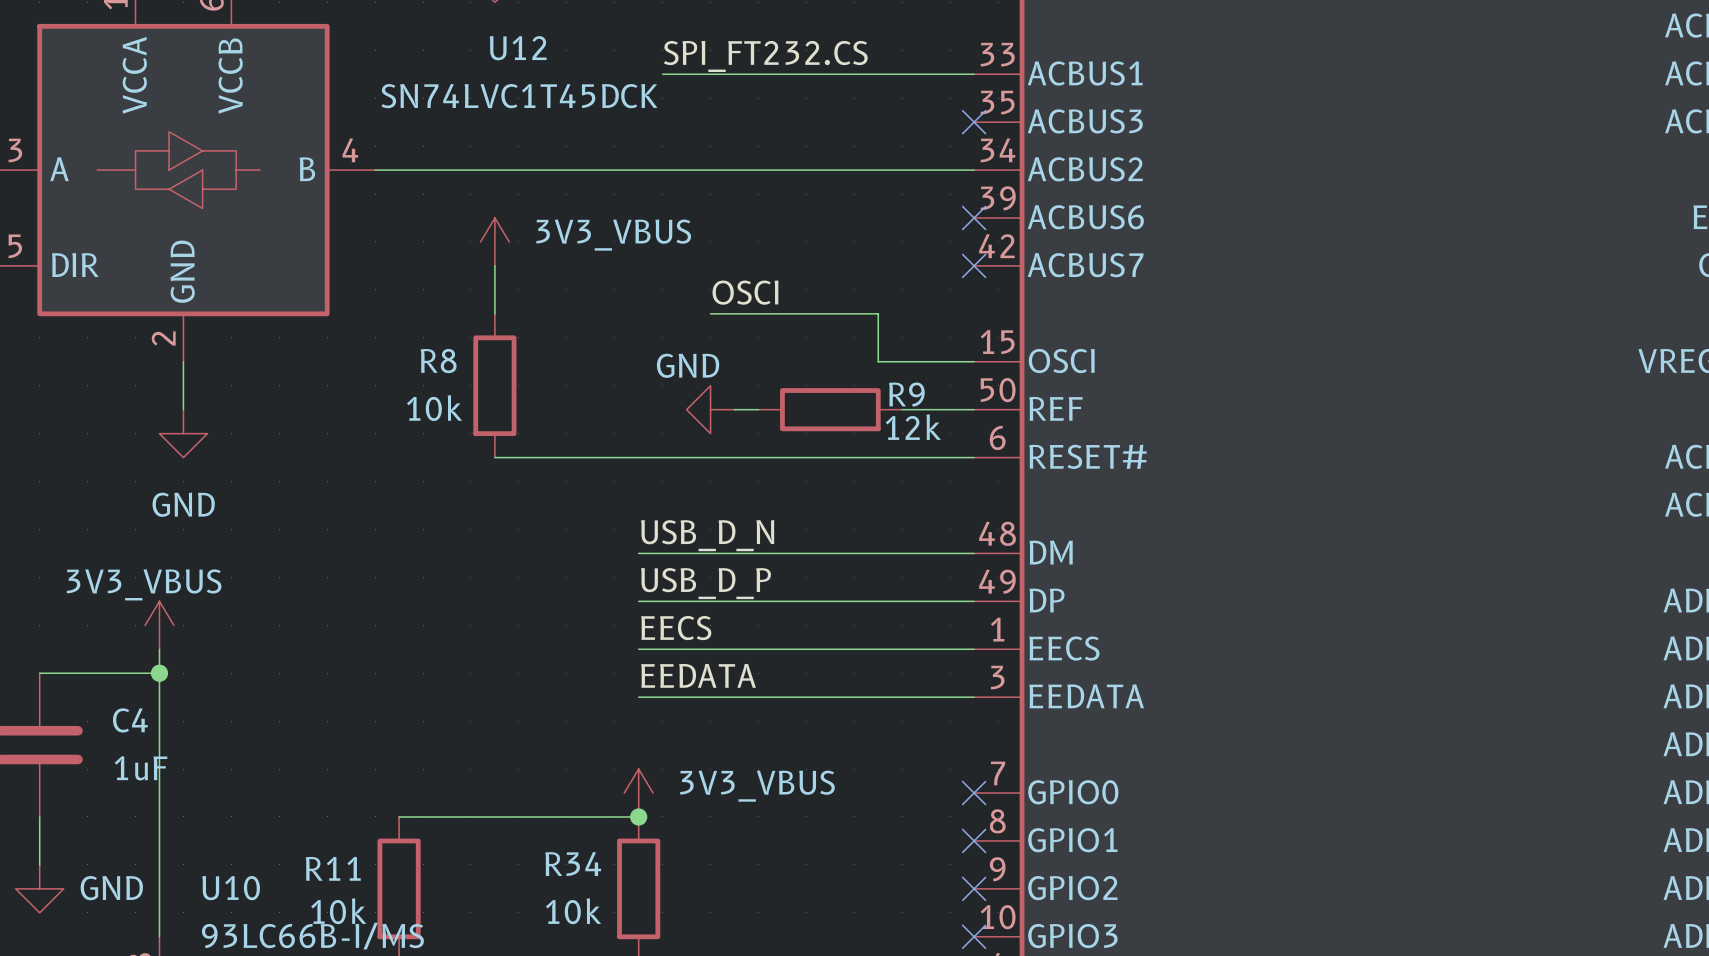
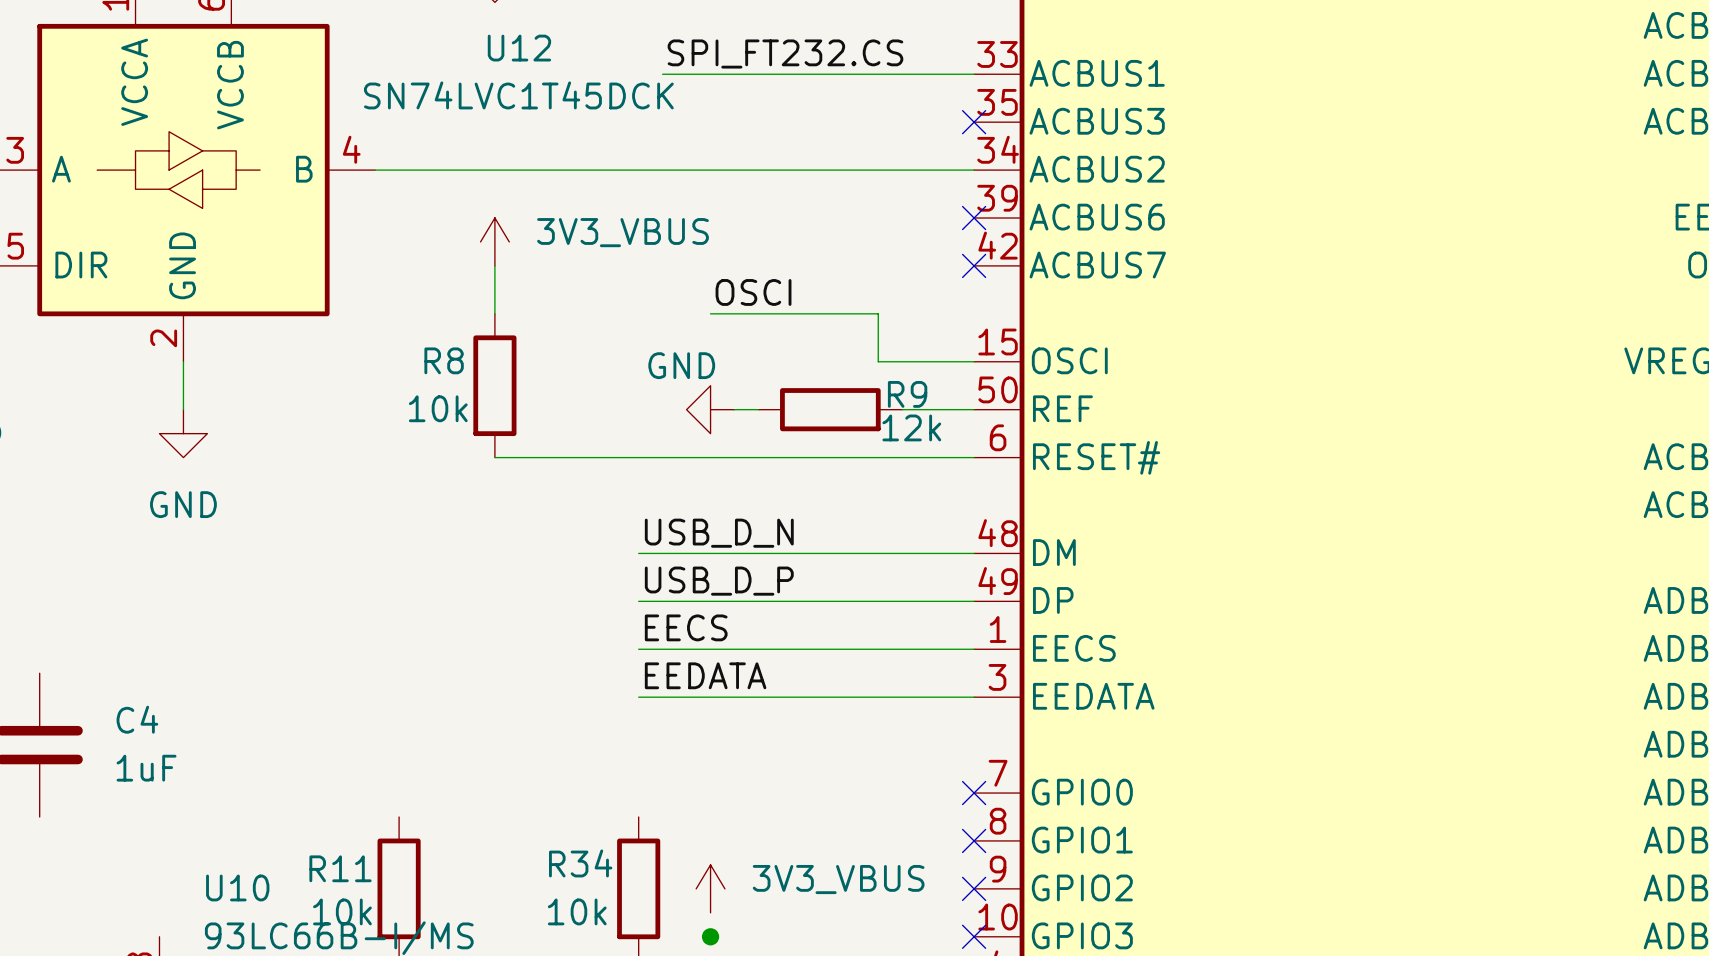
power symbol: 3V3_VBUS (159, 625) -> none
wire: (159, 649) (159, 936) -> none
wire: (39, 673) (159, 673) -> none
junction: (159, 673) -> none
power symbol position: 3V3_VBUS (638, 793) -> 3V3_VBUS (710, 888)
wire: (39, 816) (39, 864) -> none
wire: (399, 816) (638, 816) -> none
junction: (638, 816) -> none
power symbol: GND (39, 888) -> none
junction: none -> (710, 936)

